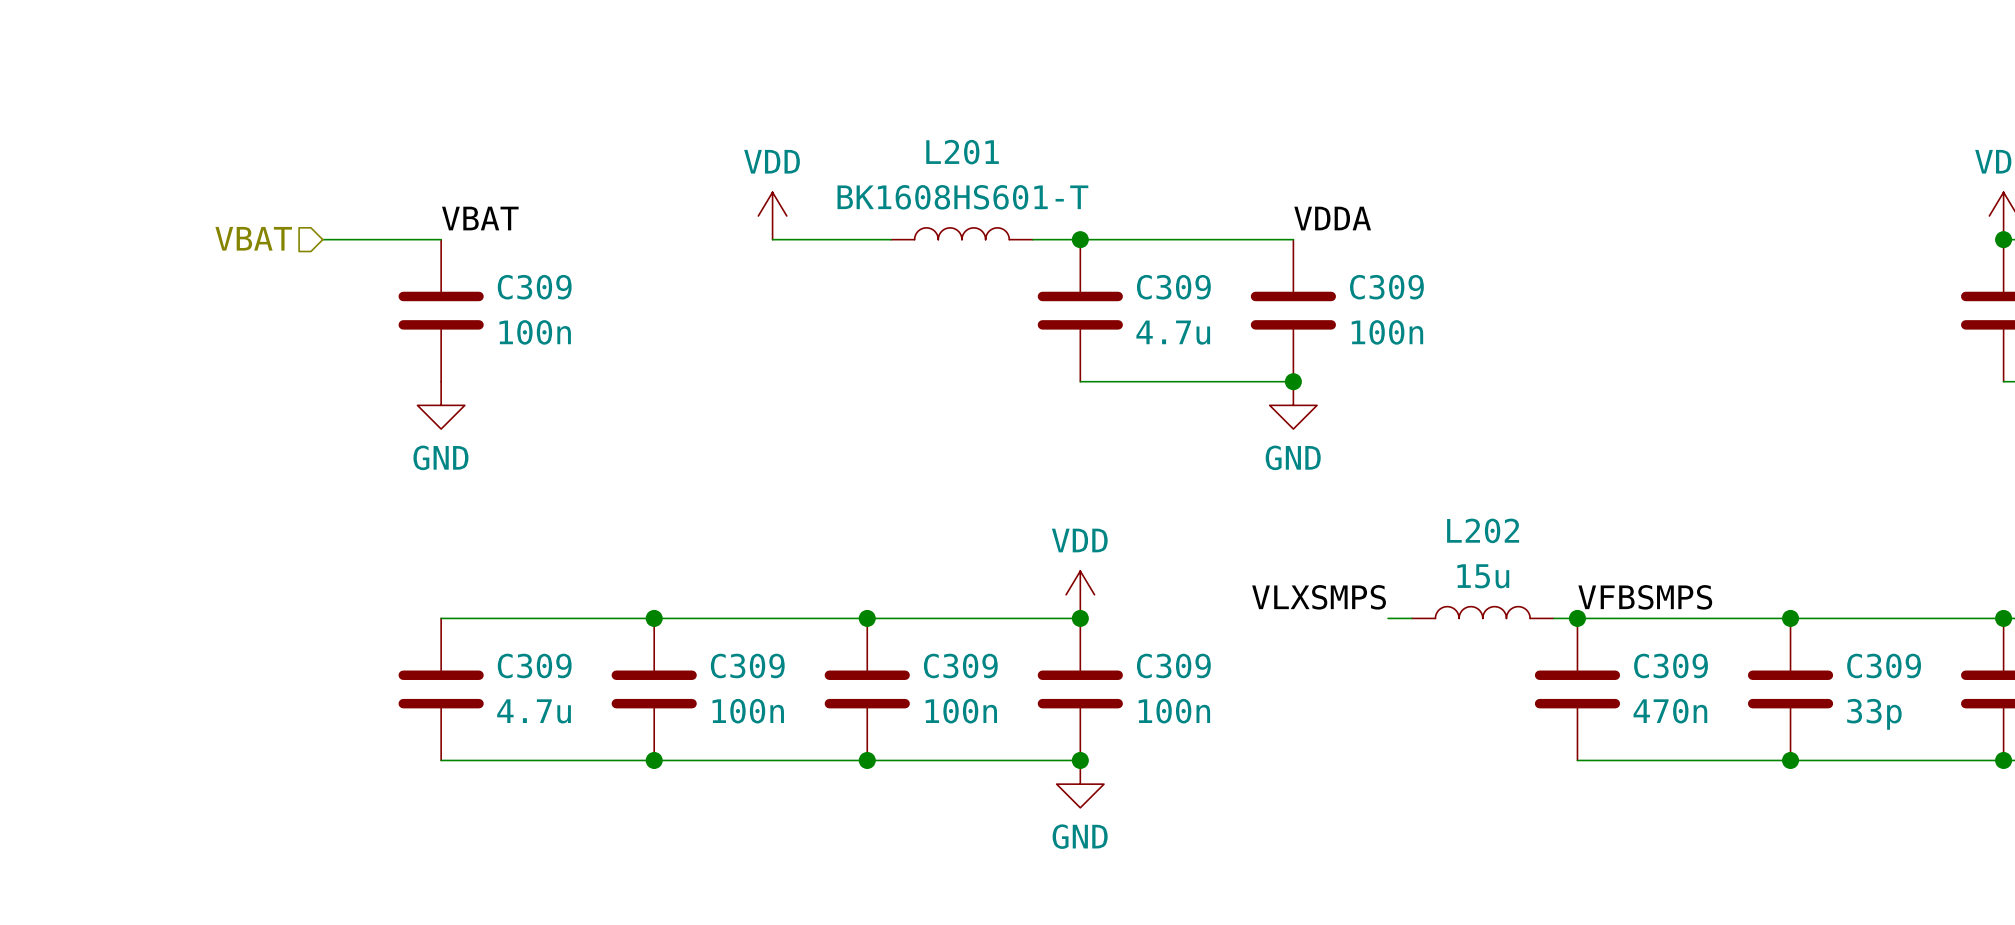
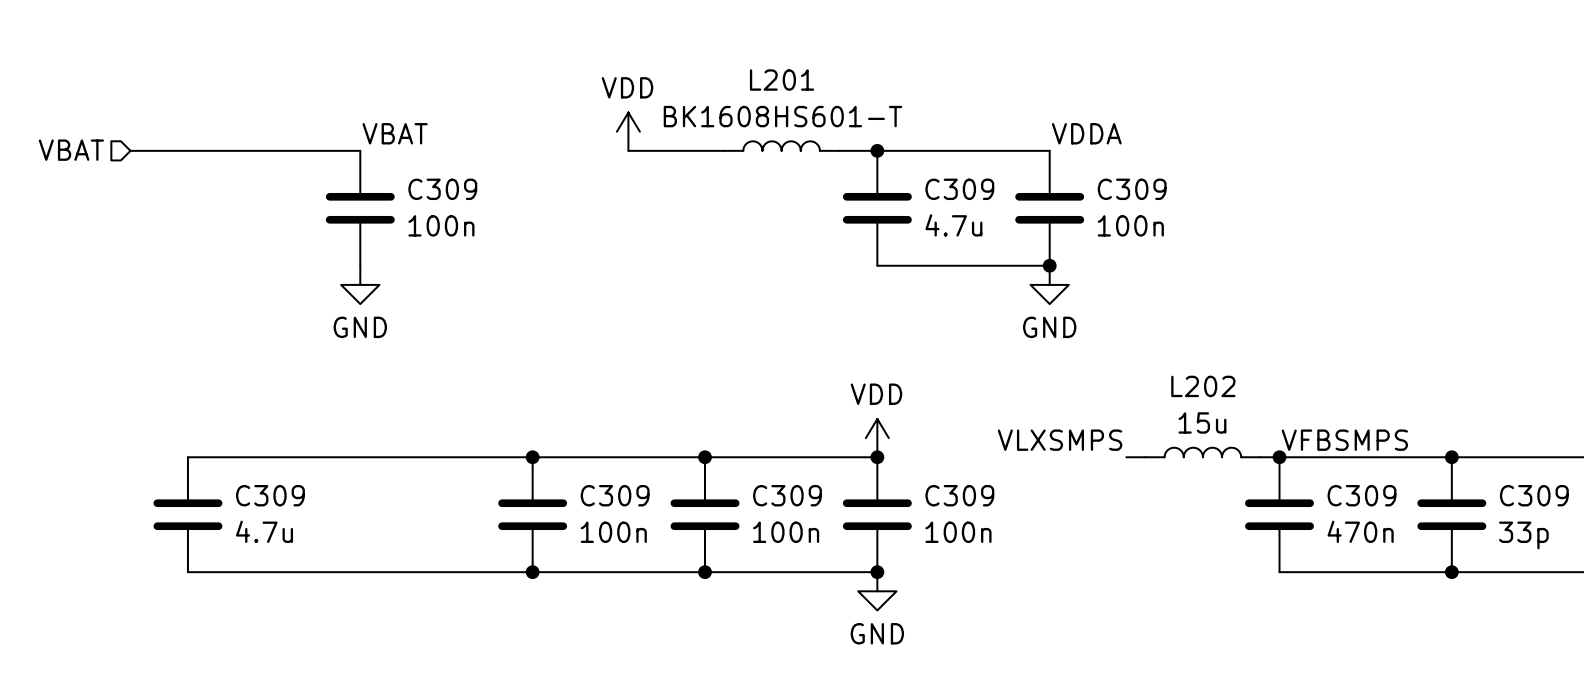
hierarchical label position: VBAT (253, 238) -> VBAT (71, 150)
wire: none -> (130, 150) (264, 150)
wire: none -> (187, 457) (360, 457)
C309 position: (441, 689) -> (187, 514)
wire: none -> (187, 572) (360, 572)

